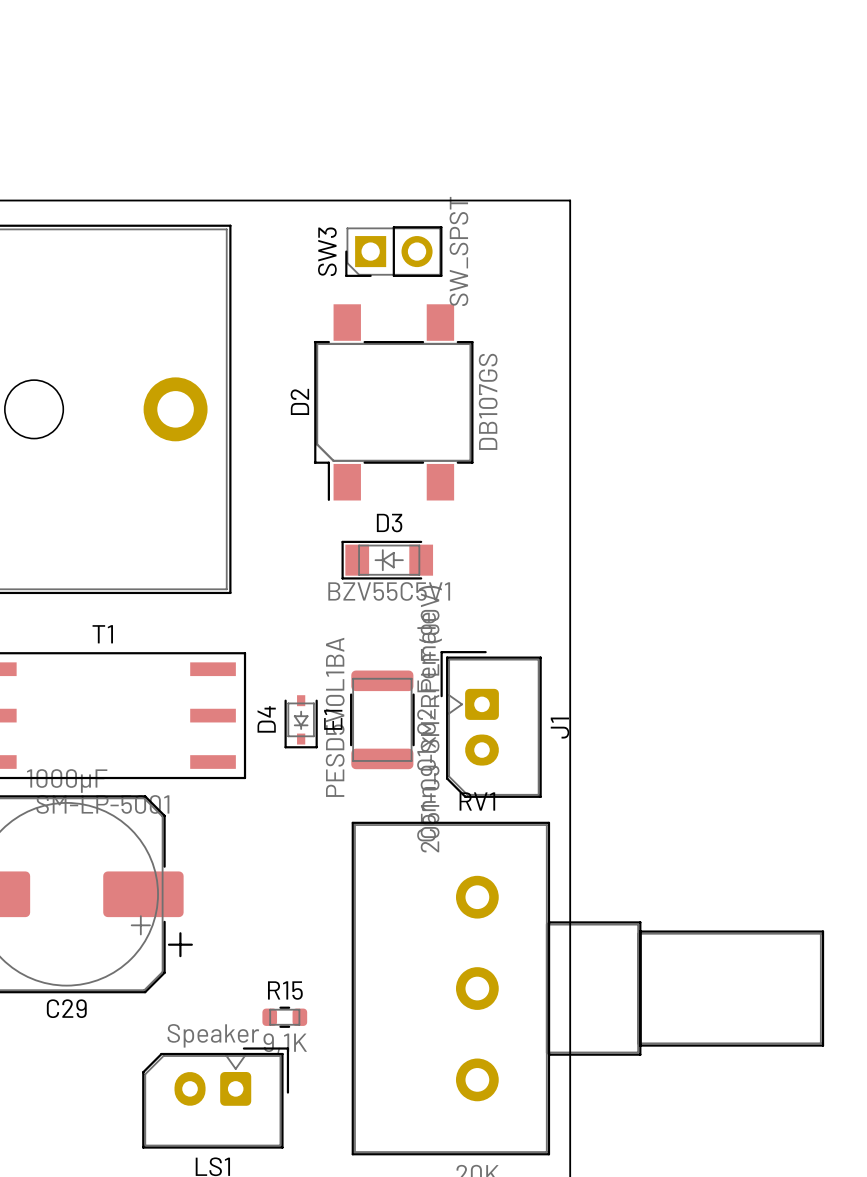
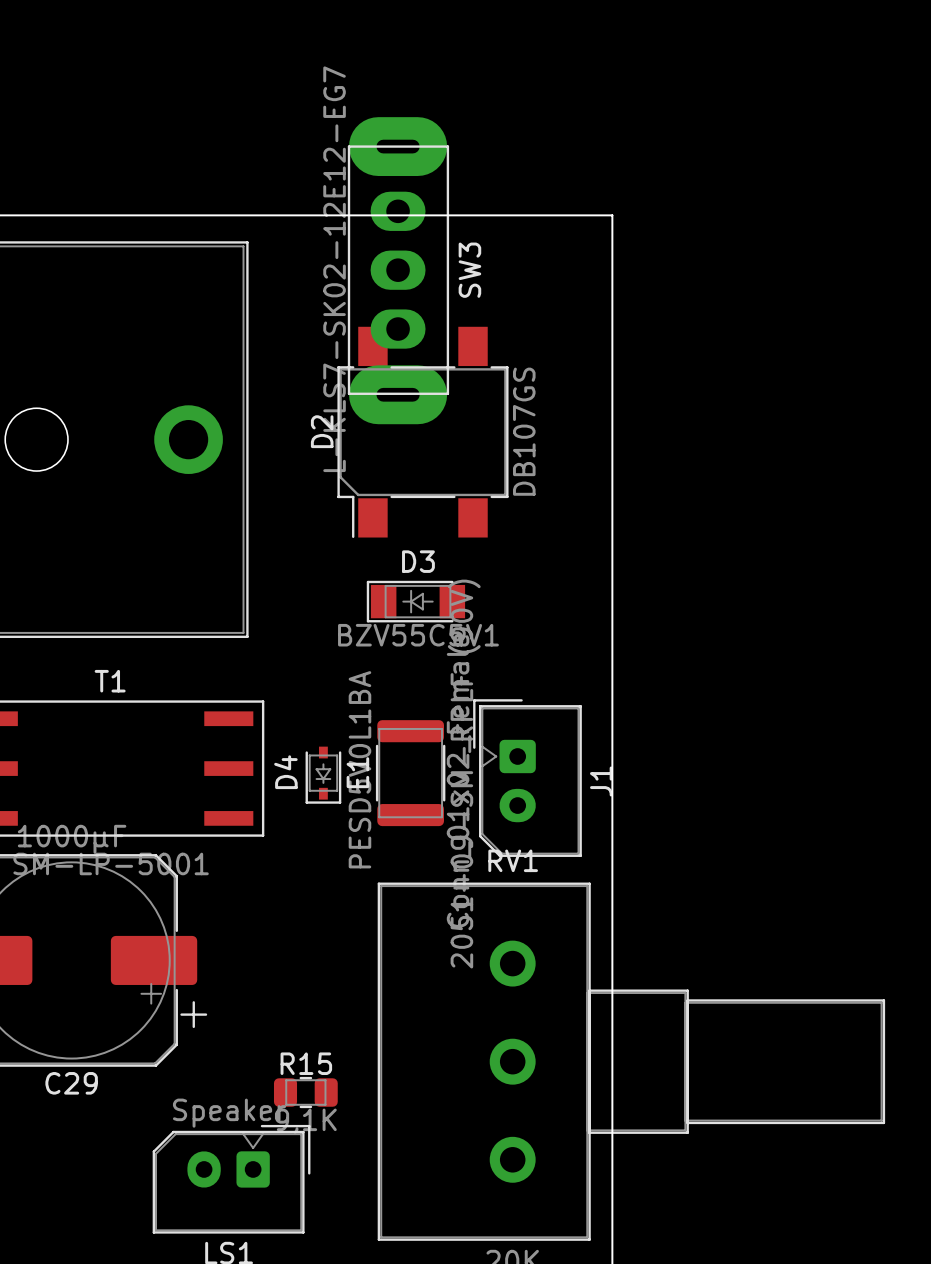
SW3 footprint: [345, 226, 443, 277] -> [347, 117, 450, 425]
SW3 name position: SW3 (327, 251) -> SW3 (469, 270)
SW3 value: SW_SPST (458, 251) -> L-KLS7-SK02-12E12-EG7 (334, 269)
R15 footprint: [262, 1006, 308, 1028] -> [273, 1076, 338, 1109]

